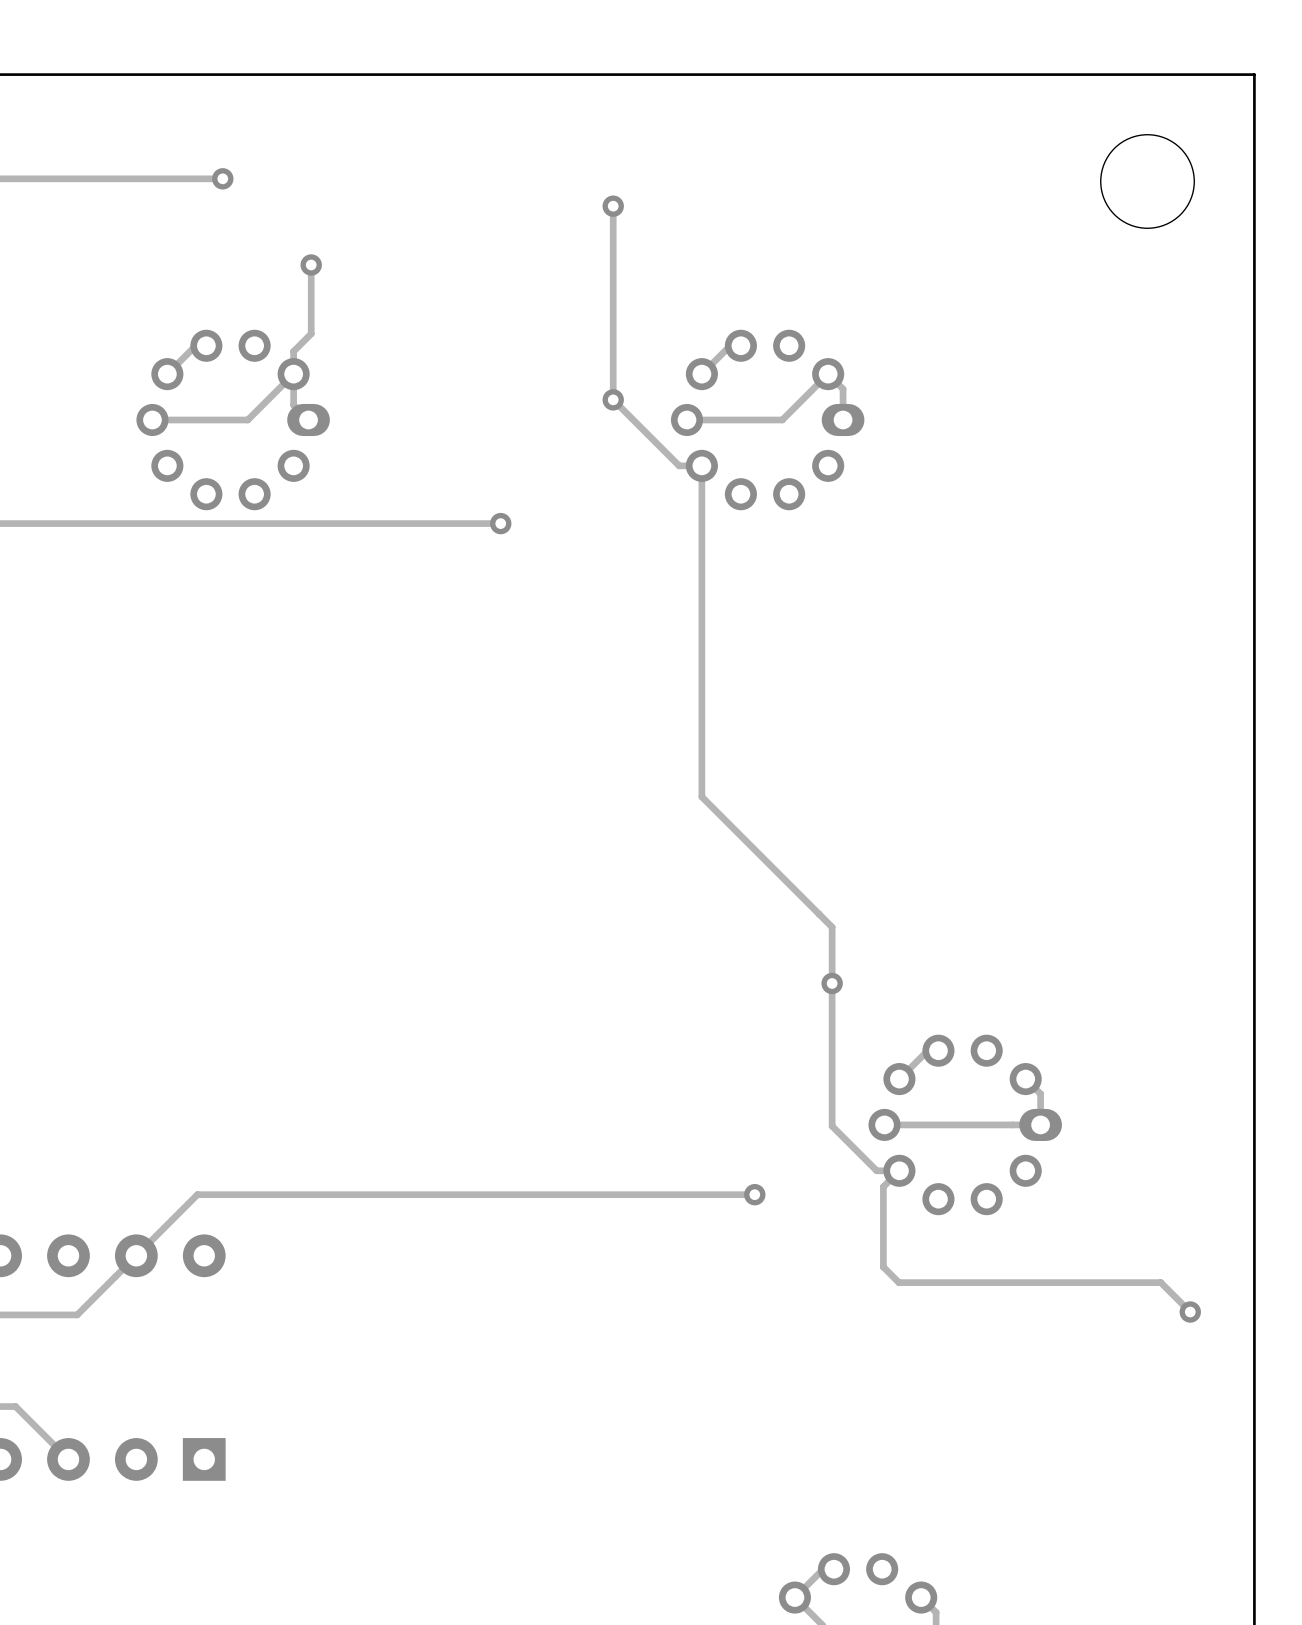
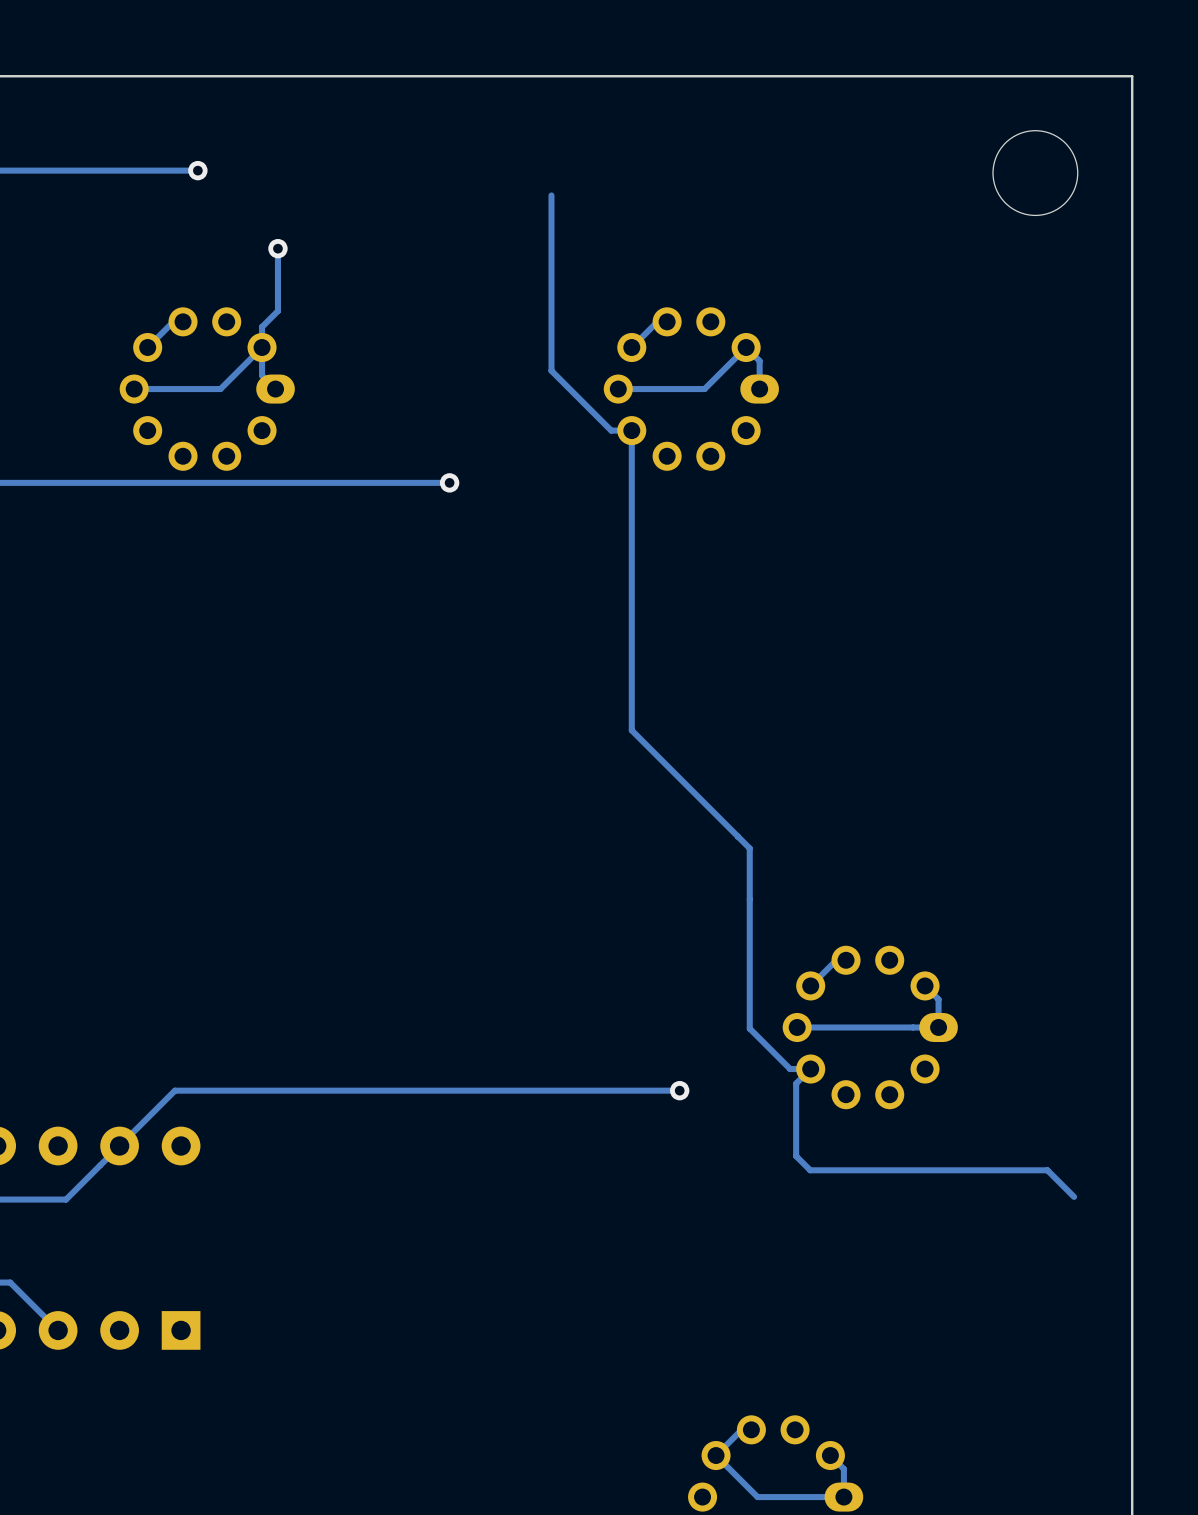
via: (613, 206) -> none
via: (613, 399) -> none
via: (832, 983) -> none
via: (1190, 1312) -> none

